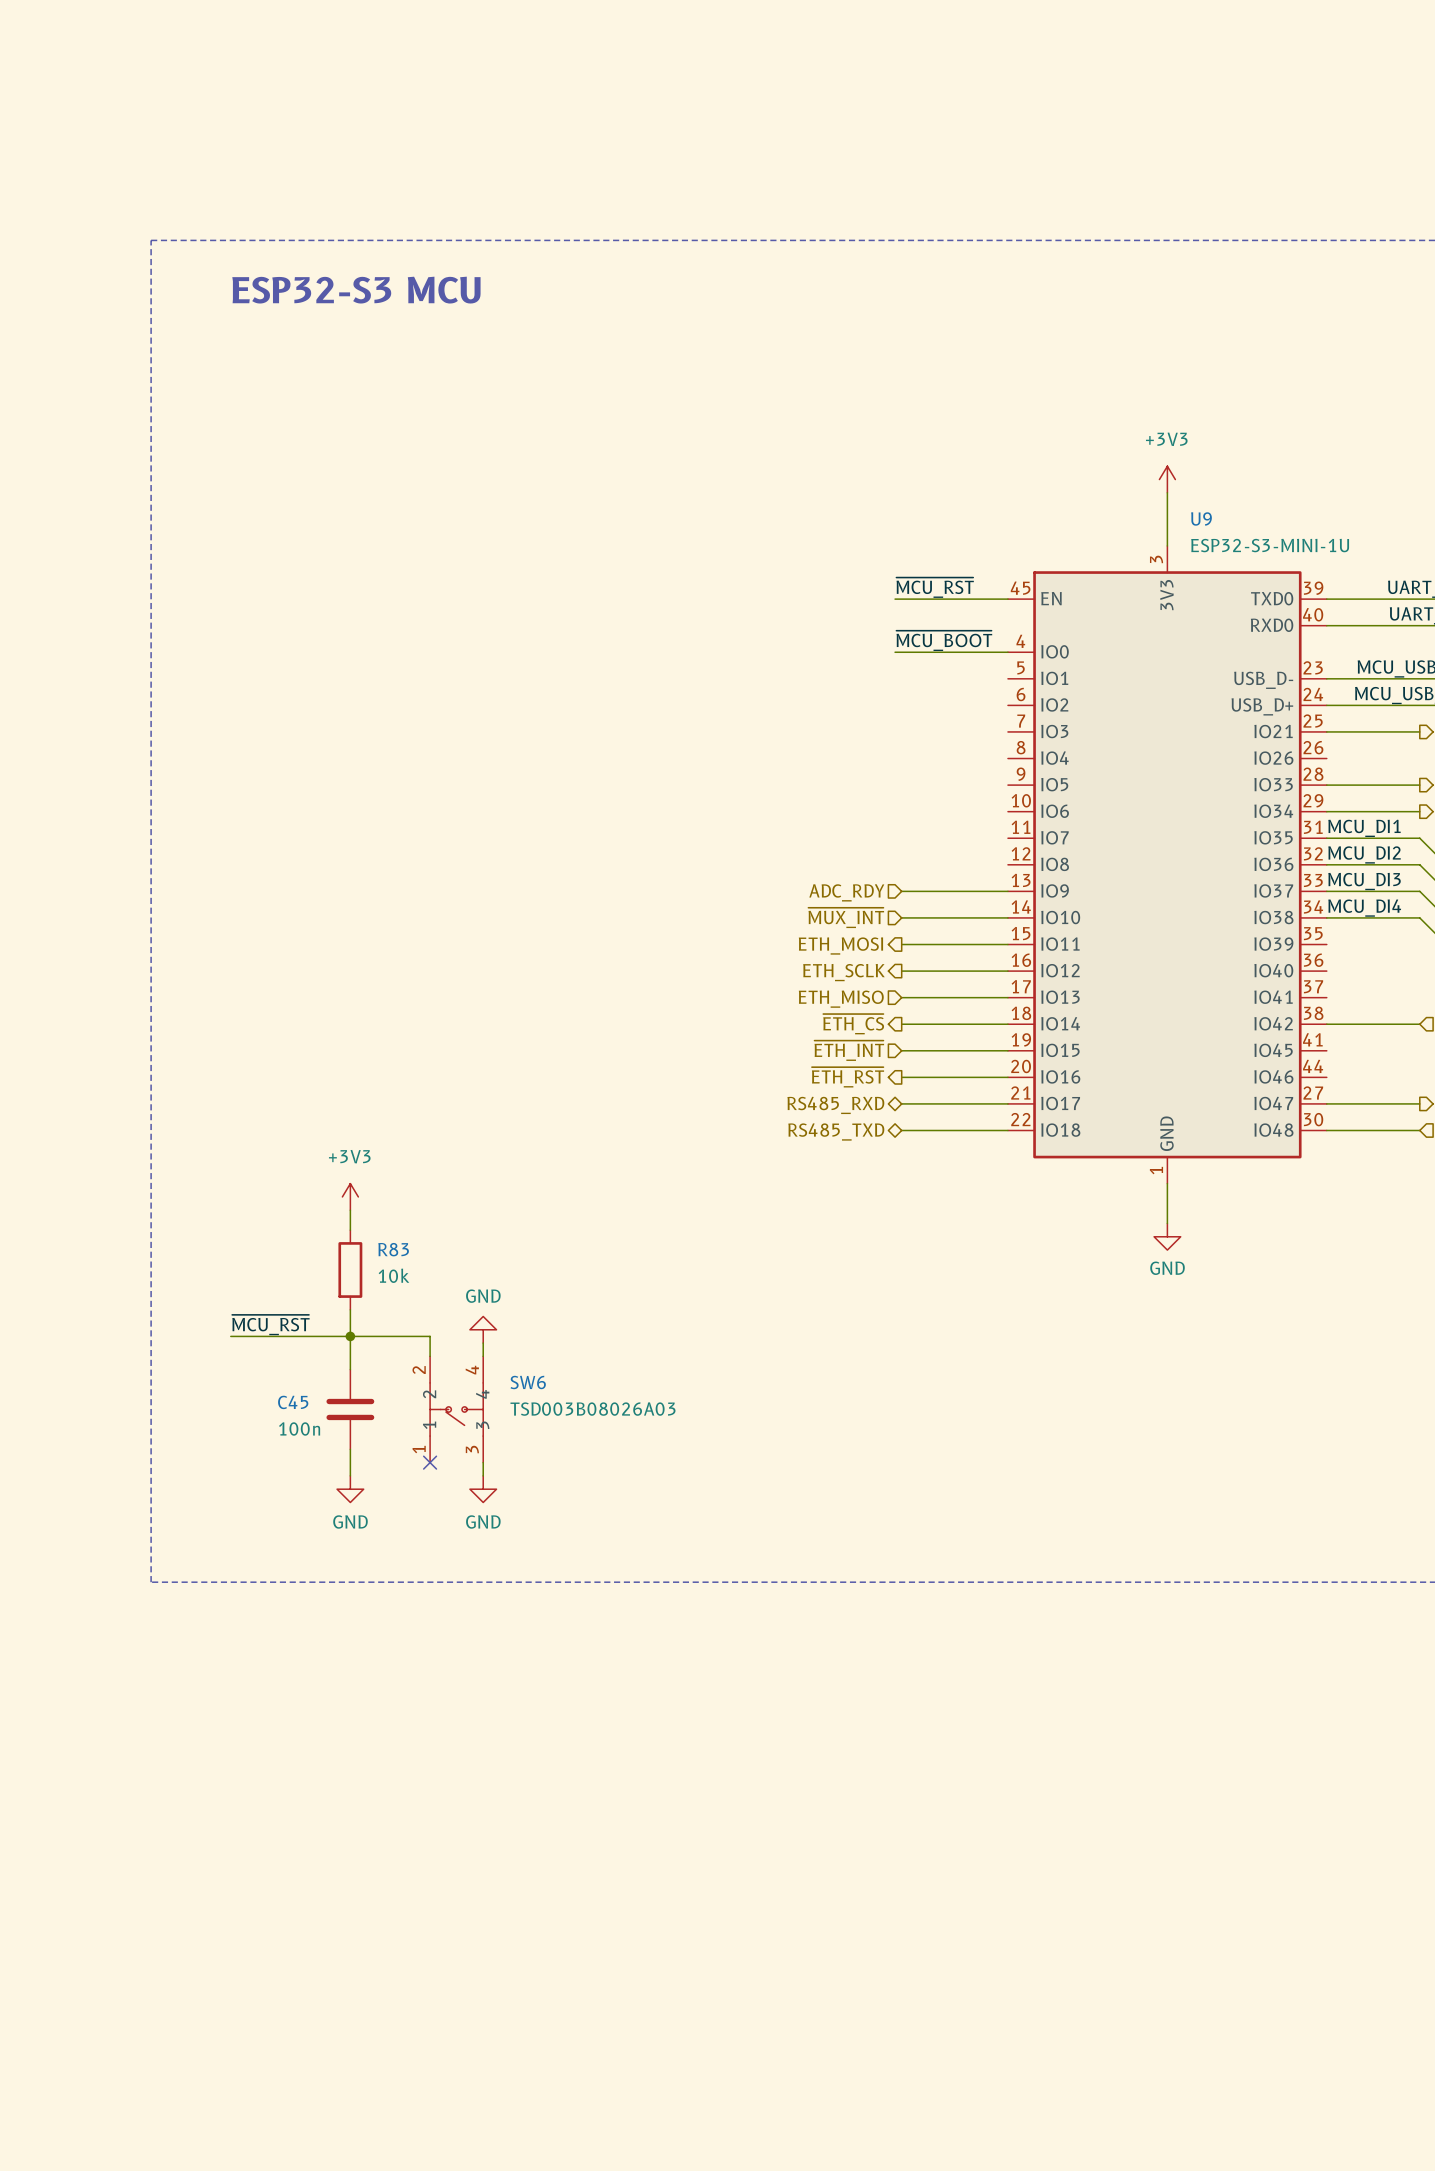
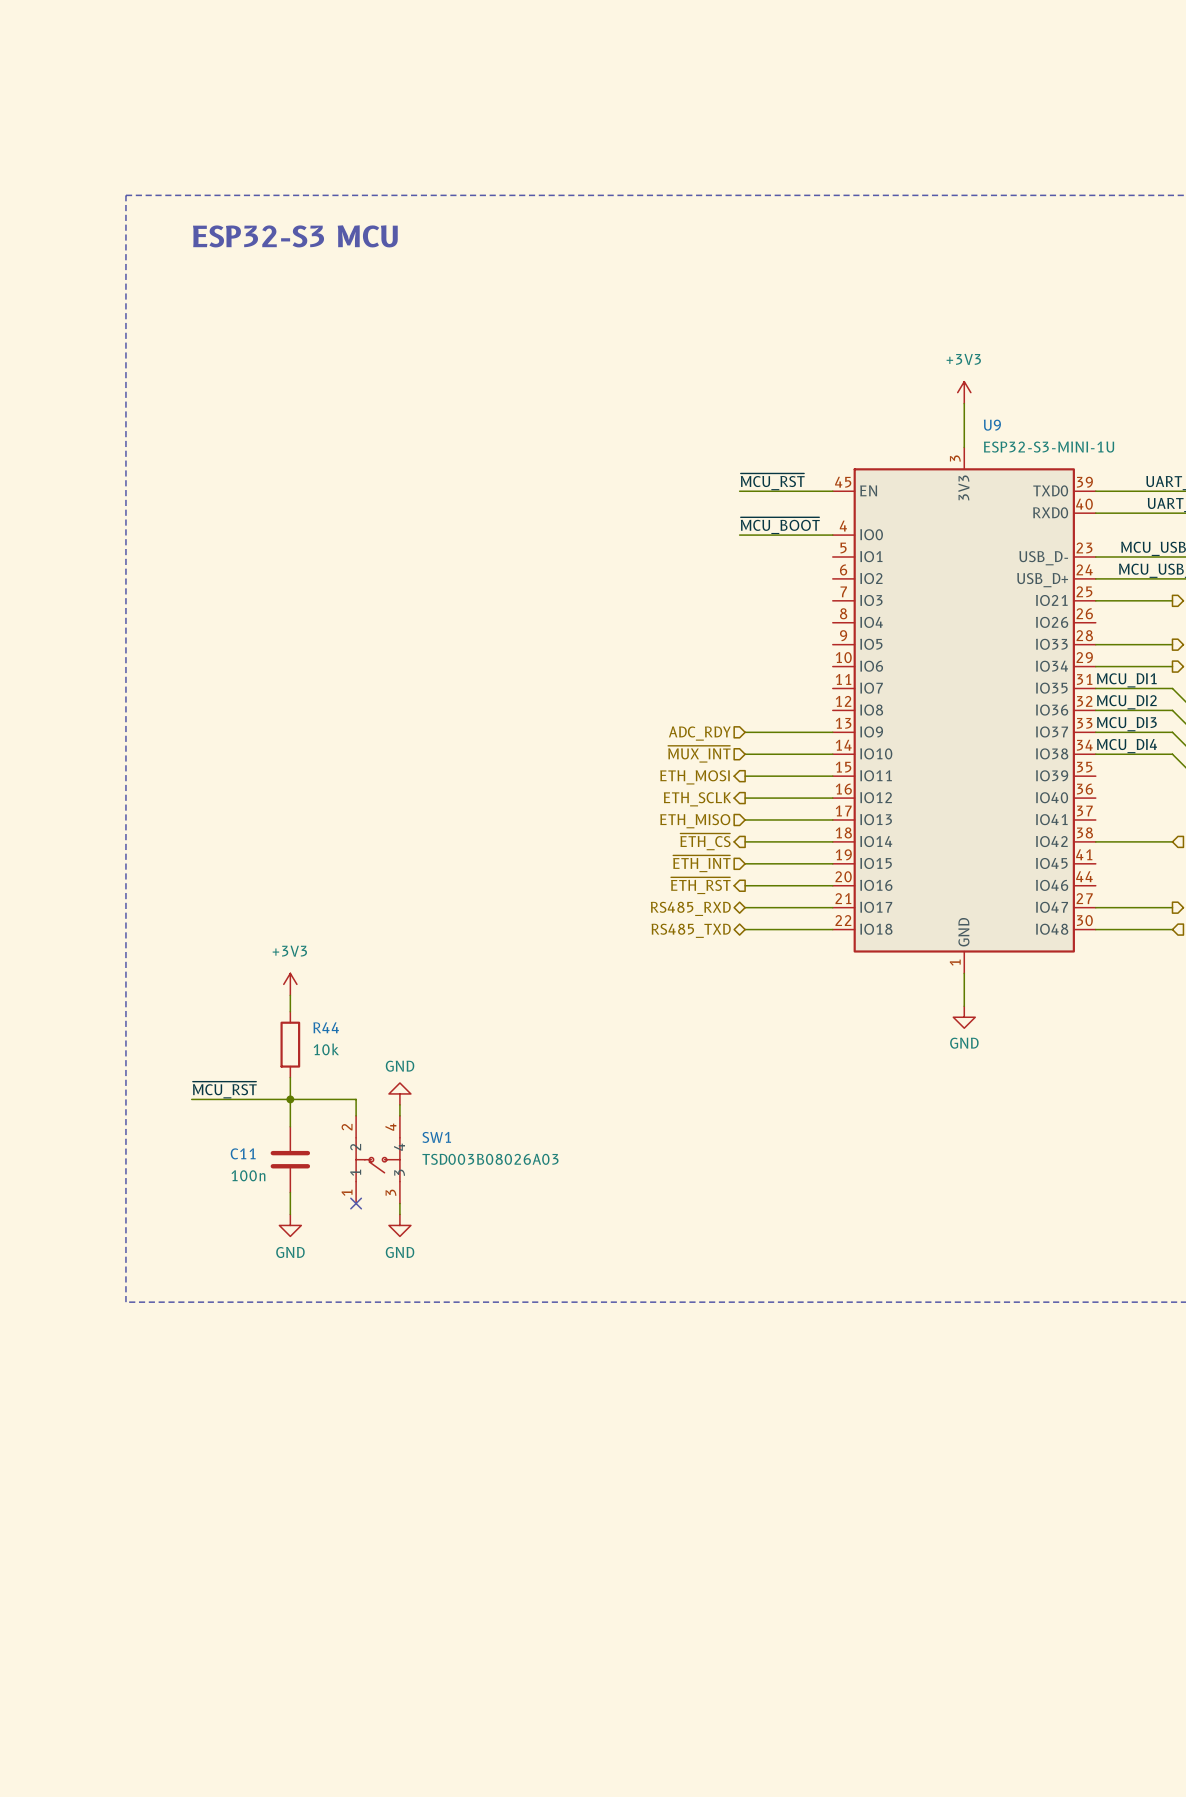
R83 name: R83 (393, 1249) -> R44 (326, 1027)
SW6 name: SW6 (528, 1382) -> SW1 (436, 1137)
C45 name: C45 (293, 1402) -> C11 (243, 1153)

